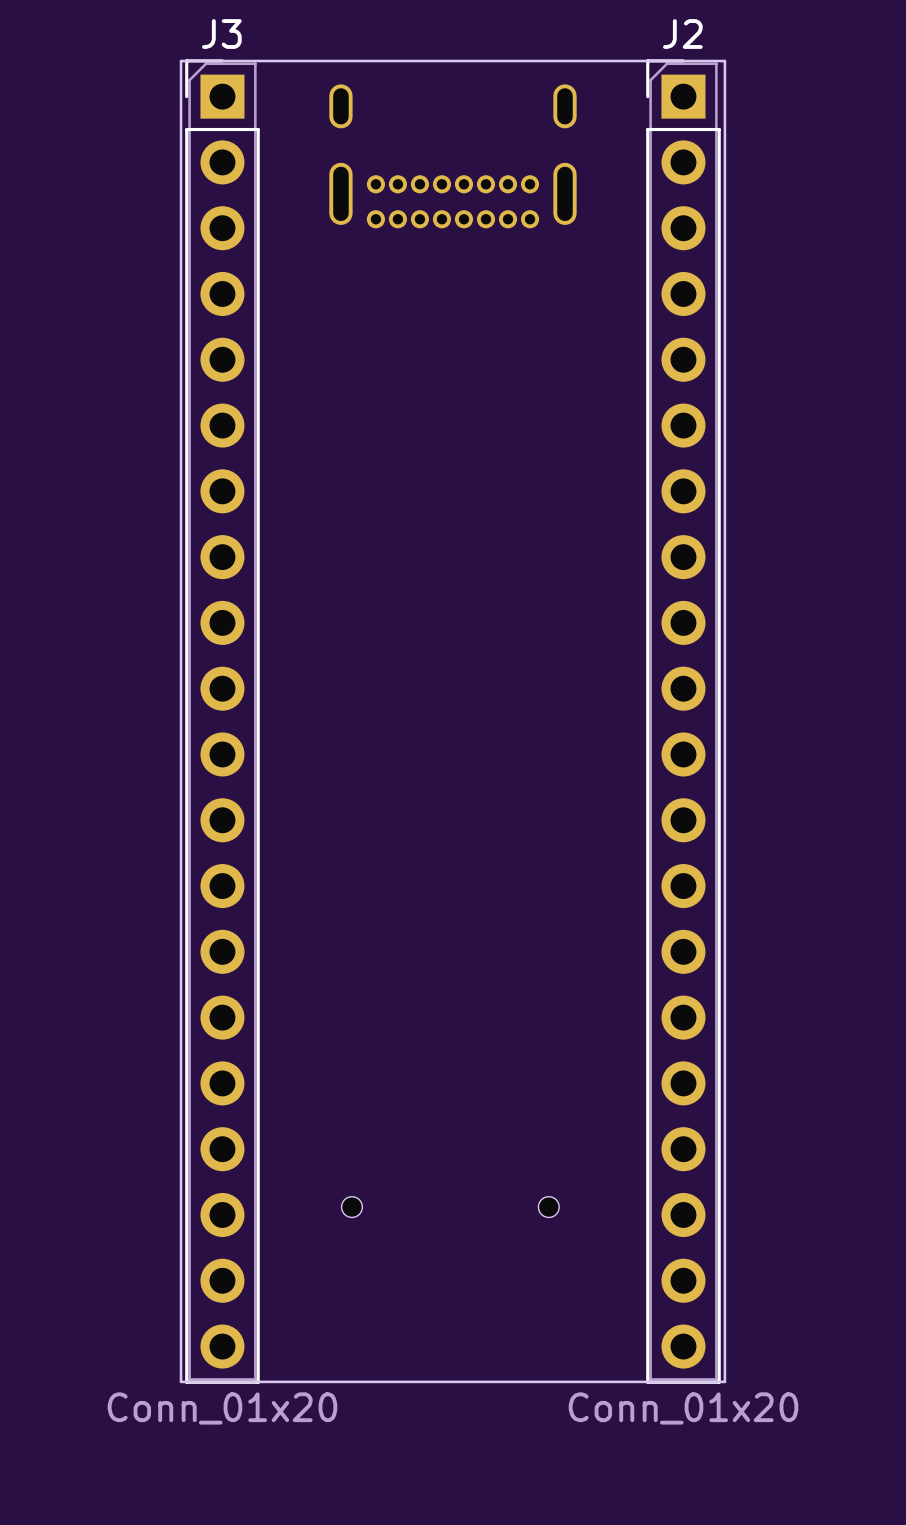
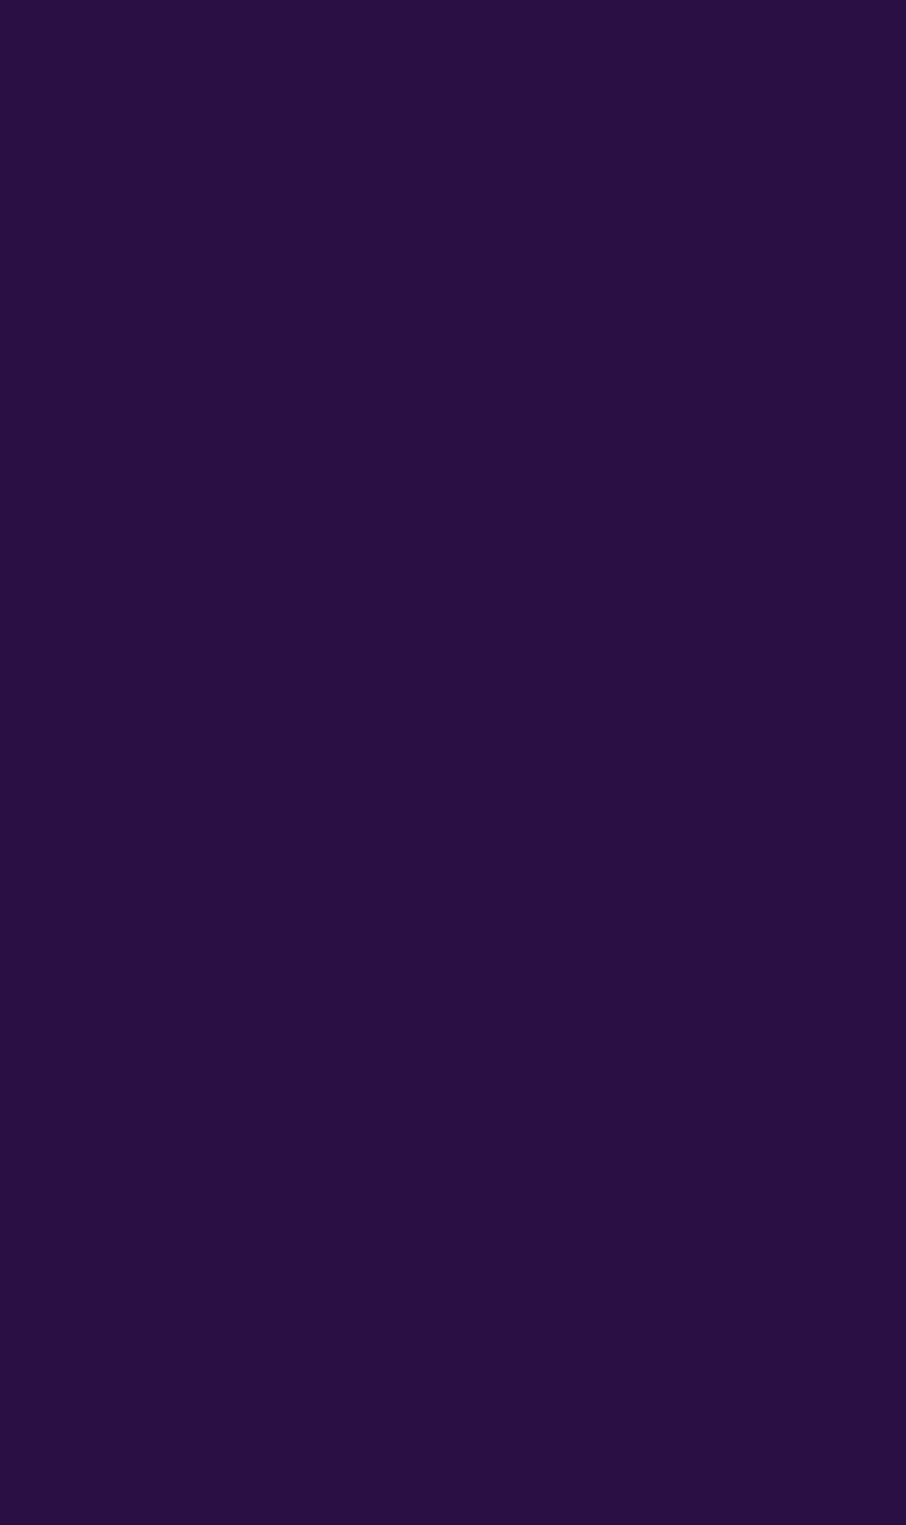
board edge: (724, 61) (181, 61) (181, 1381) (724, 1381) (724, 61) -> none
part: (452, 156) -> none
J3: Conn_01x20 (222, 721) -> none
J2: Conn_01x20 (683, 721) -> none
part: (351, 1207) -> none
part: (548, 1207) -> none

